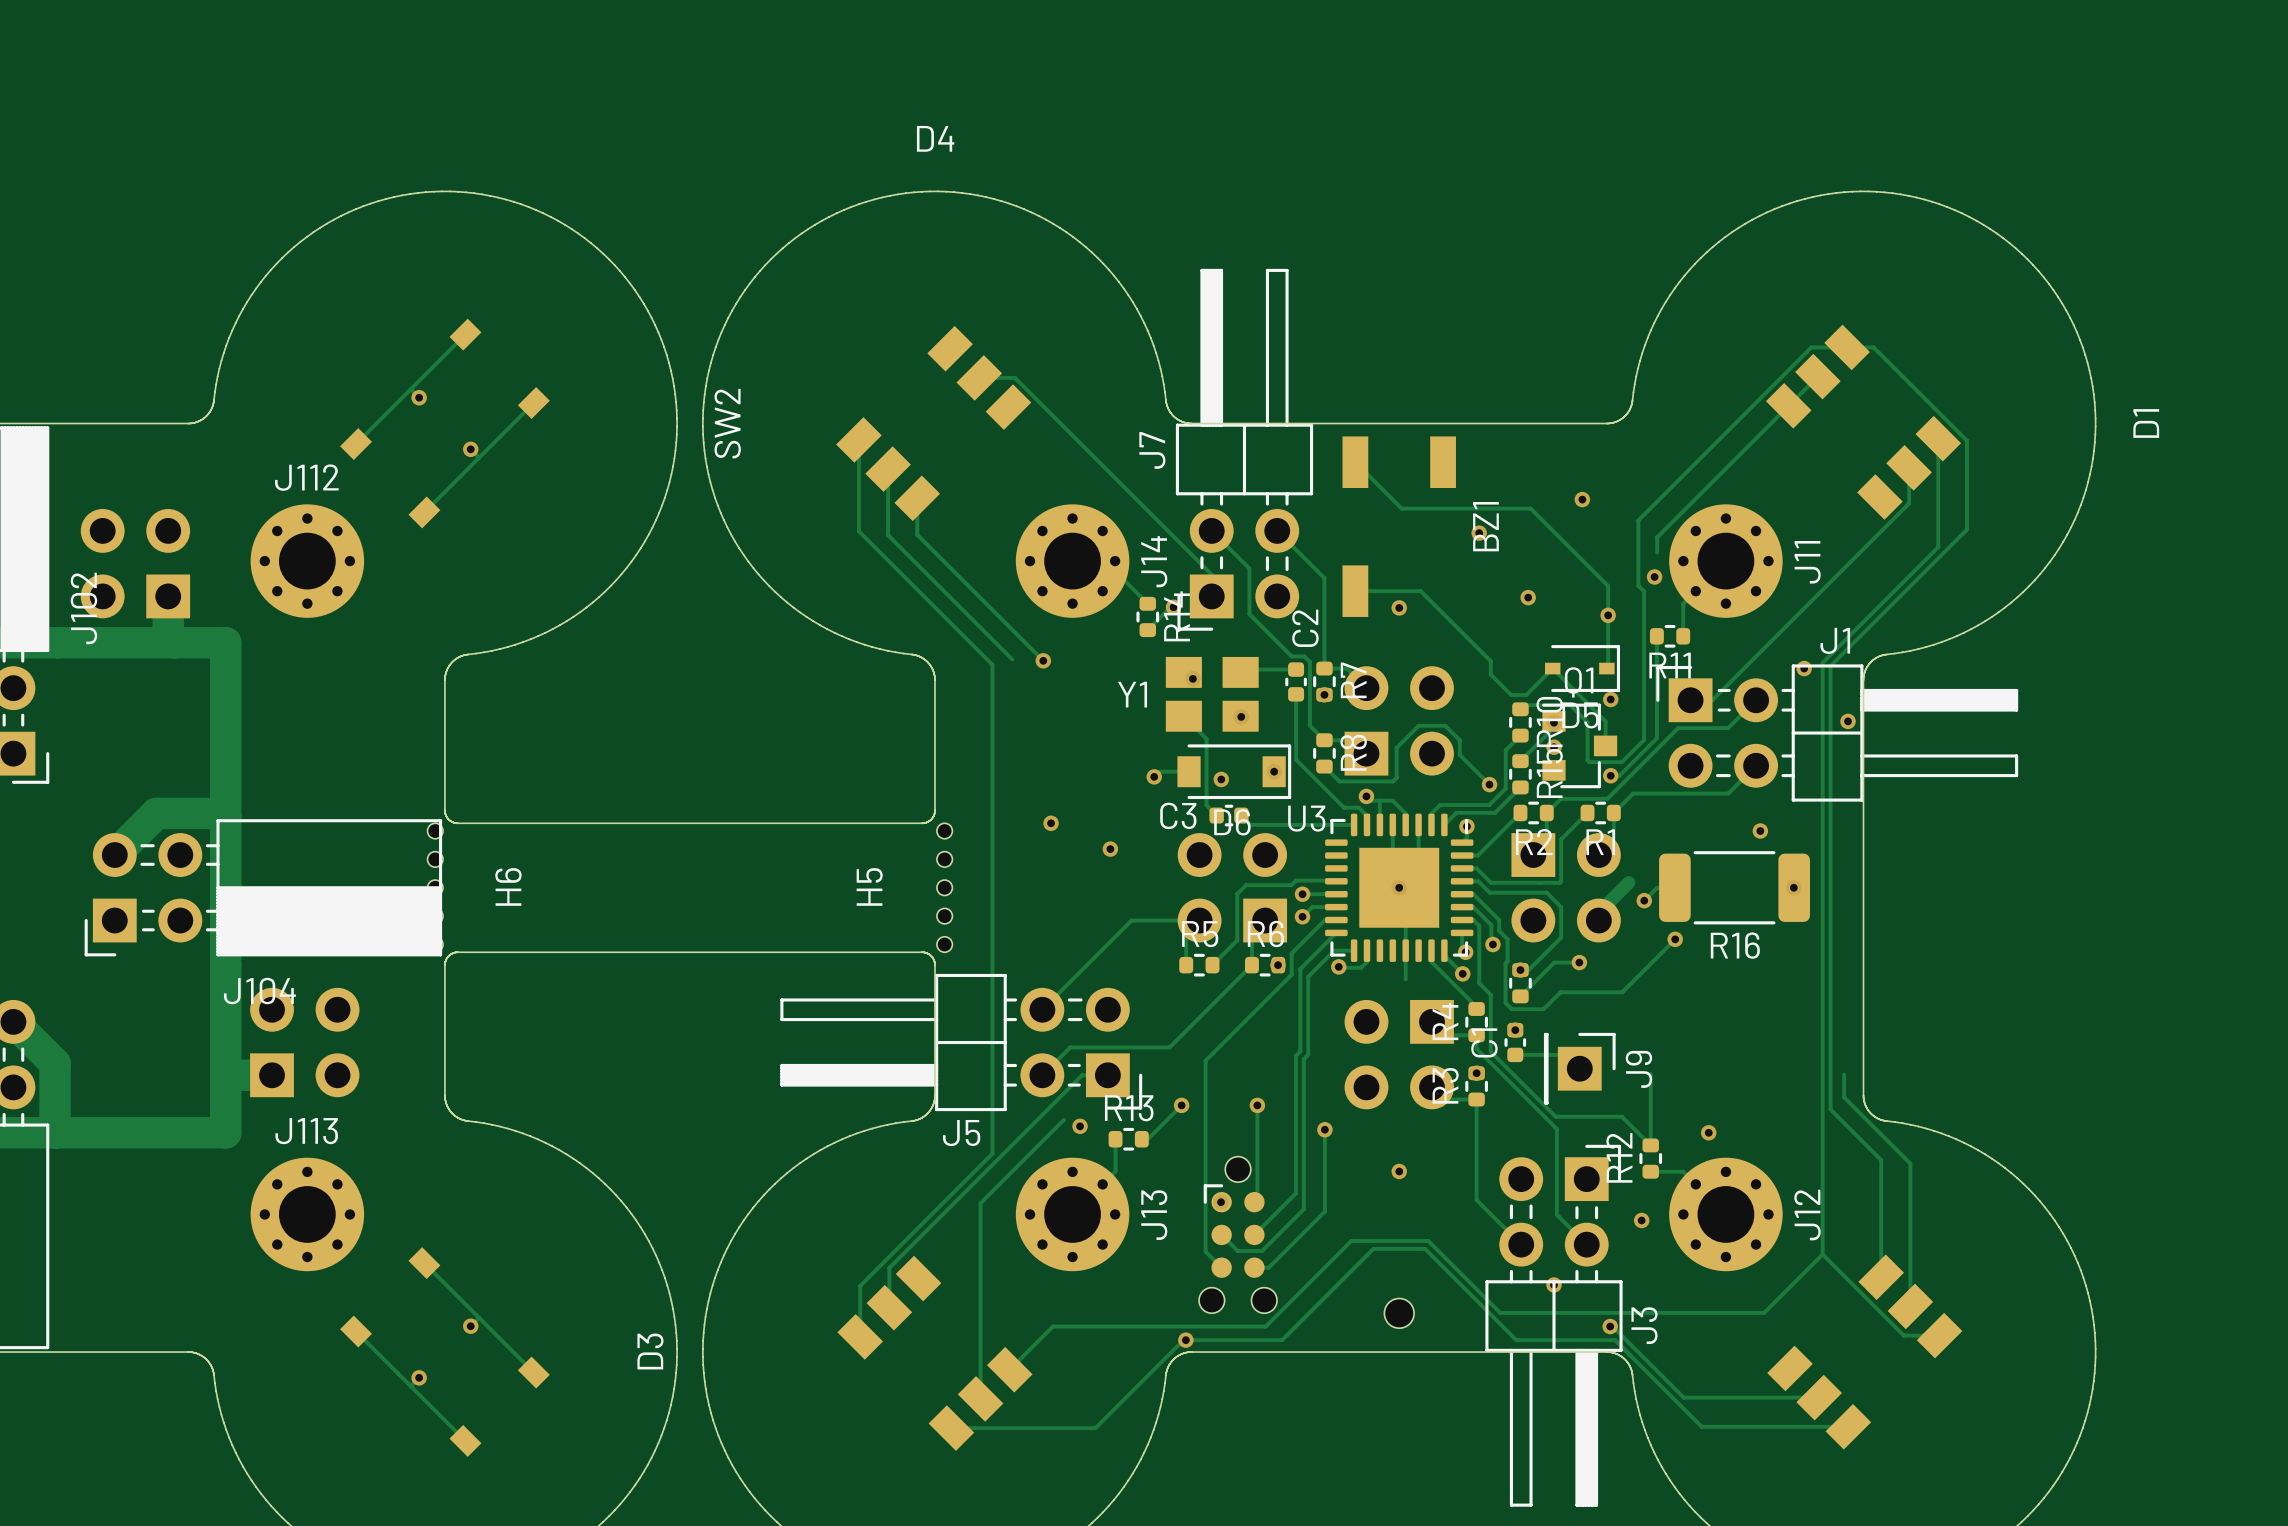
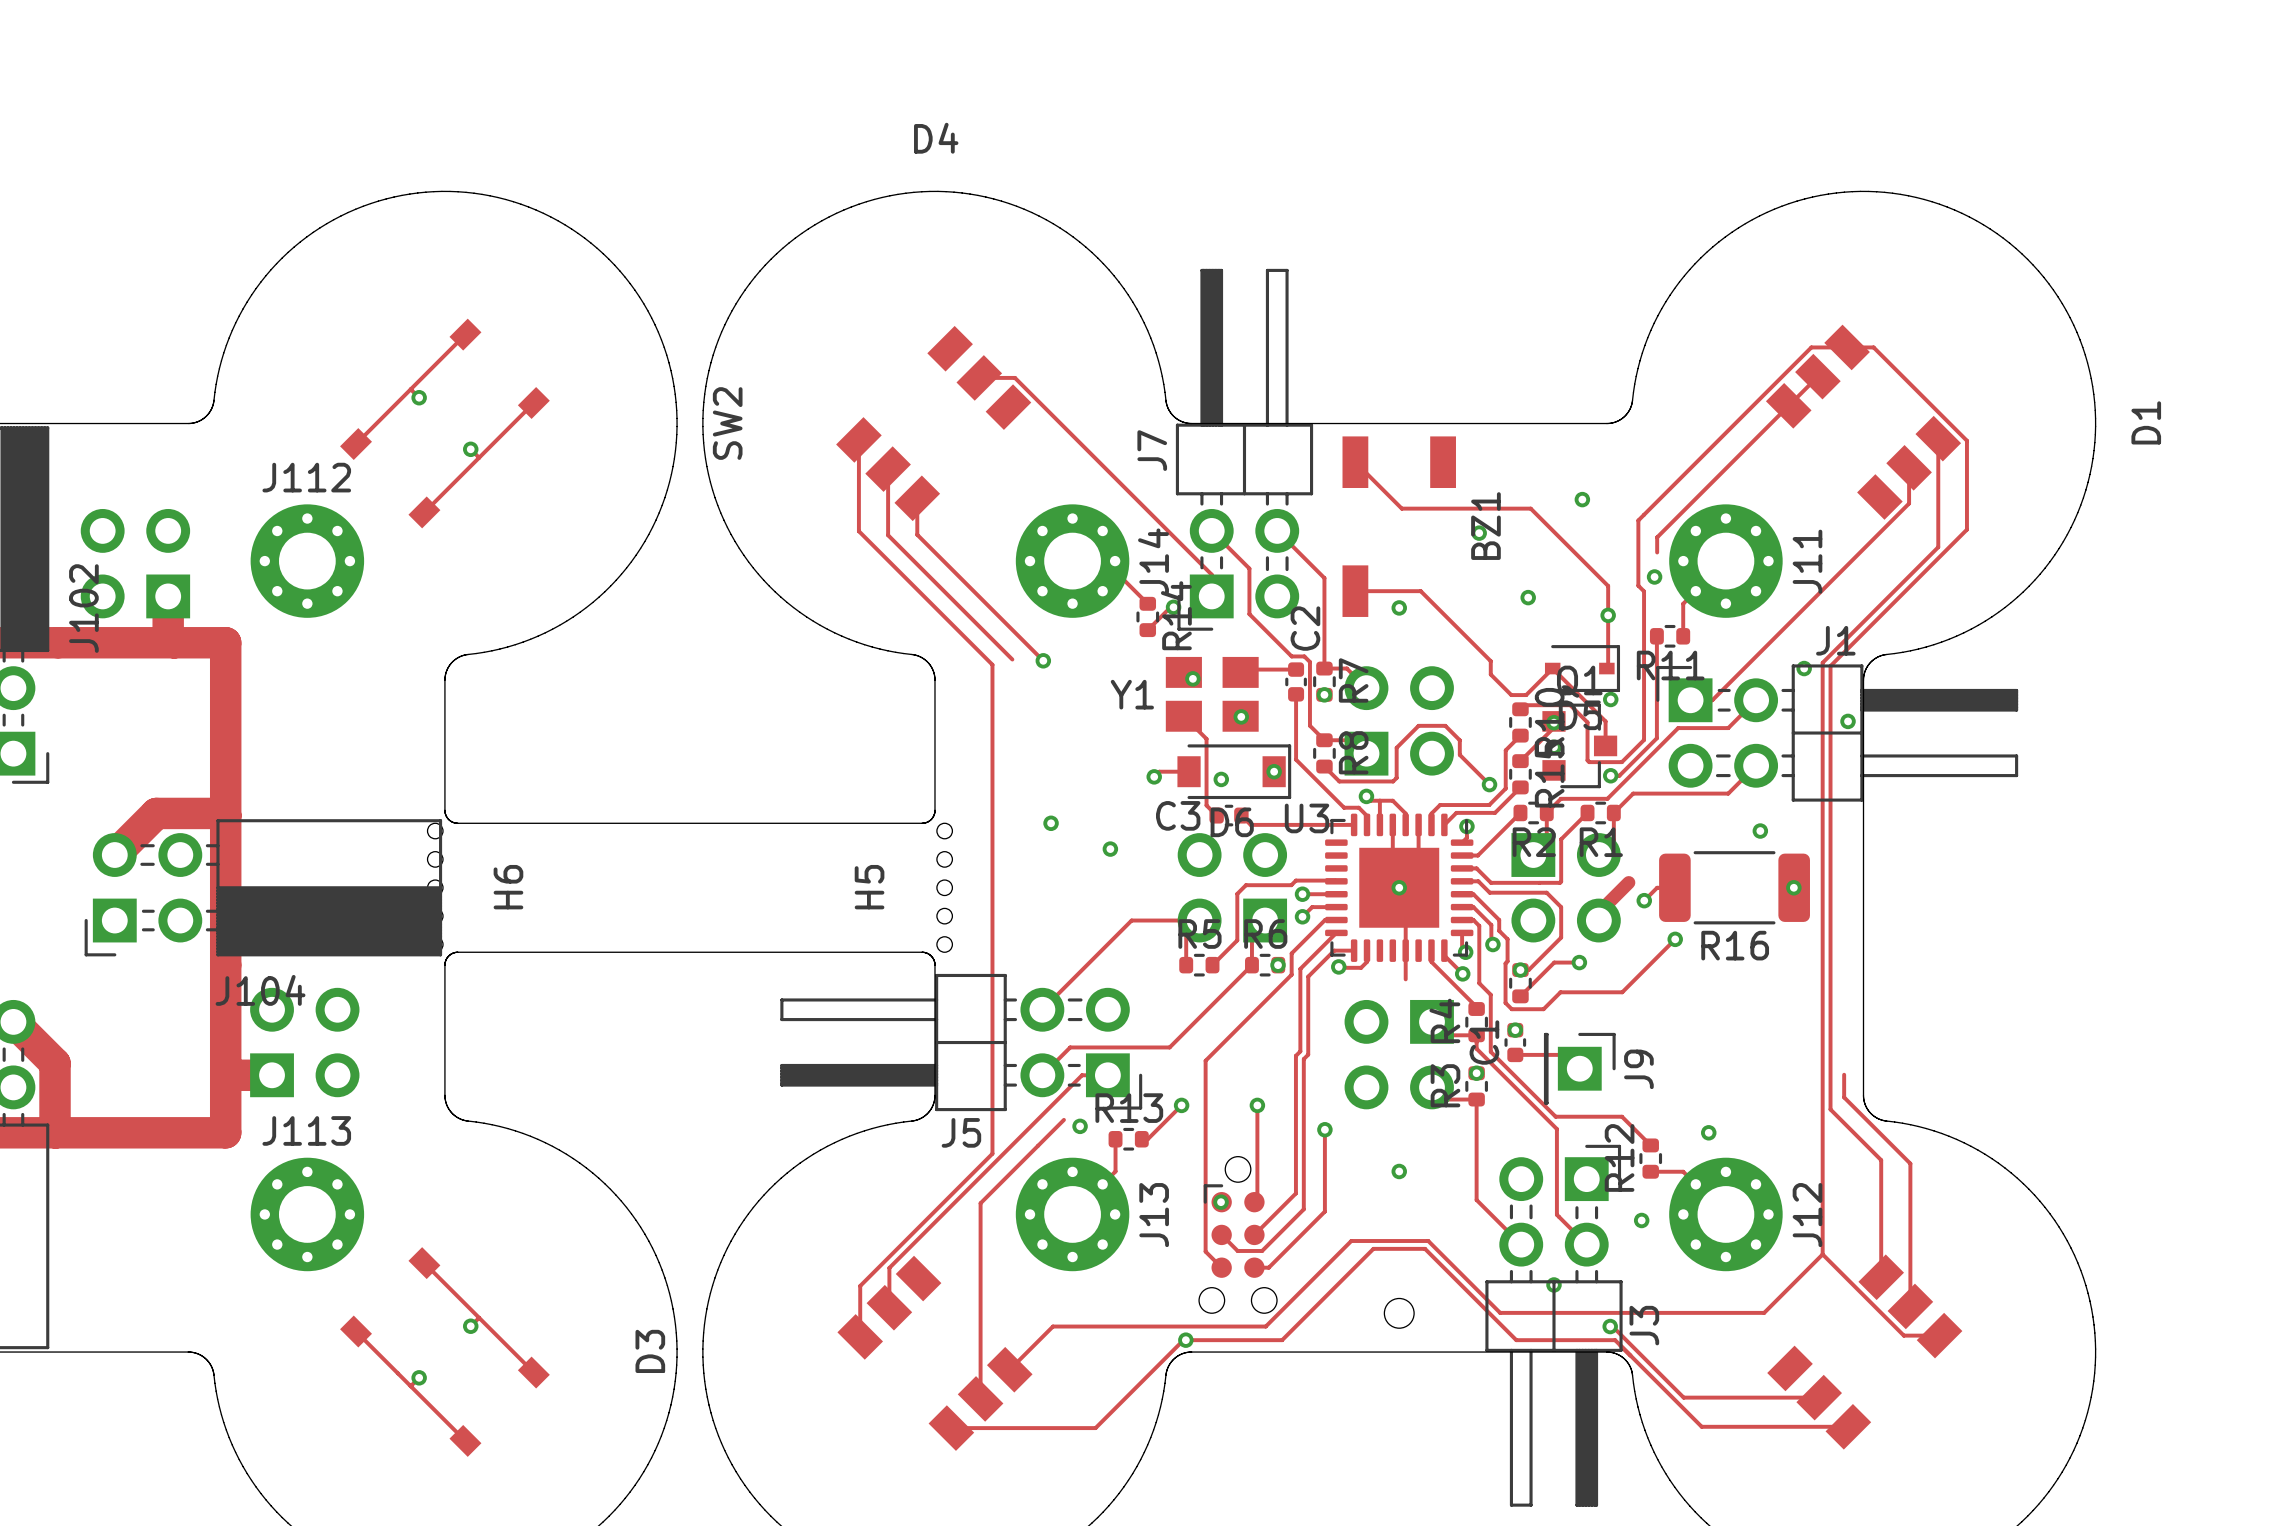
track: (1650, 1074) (1650, 1145) -> none

